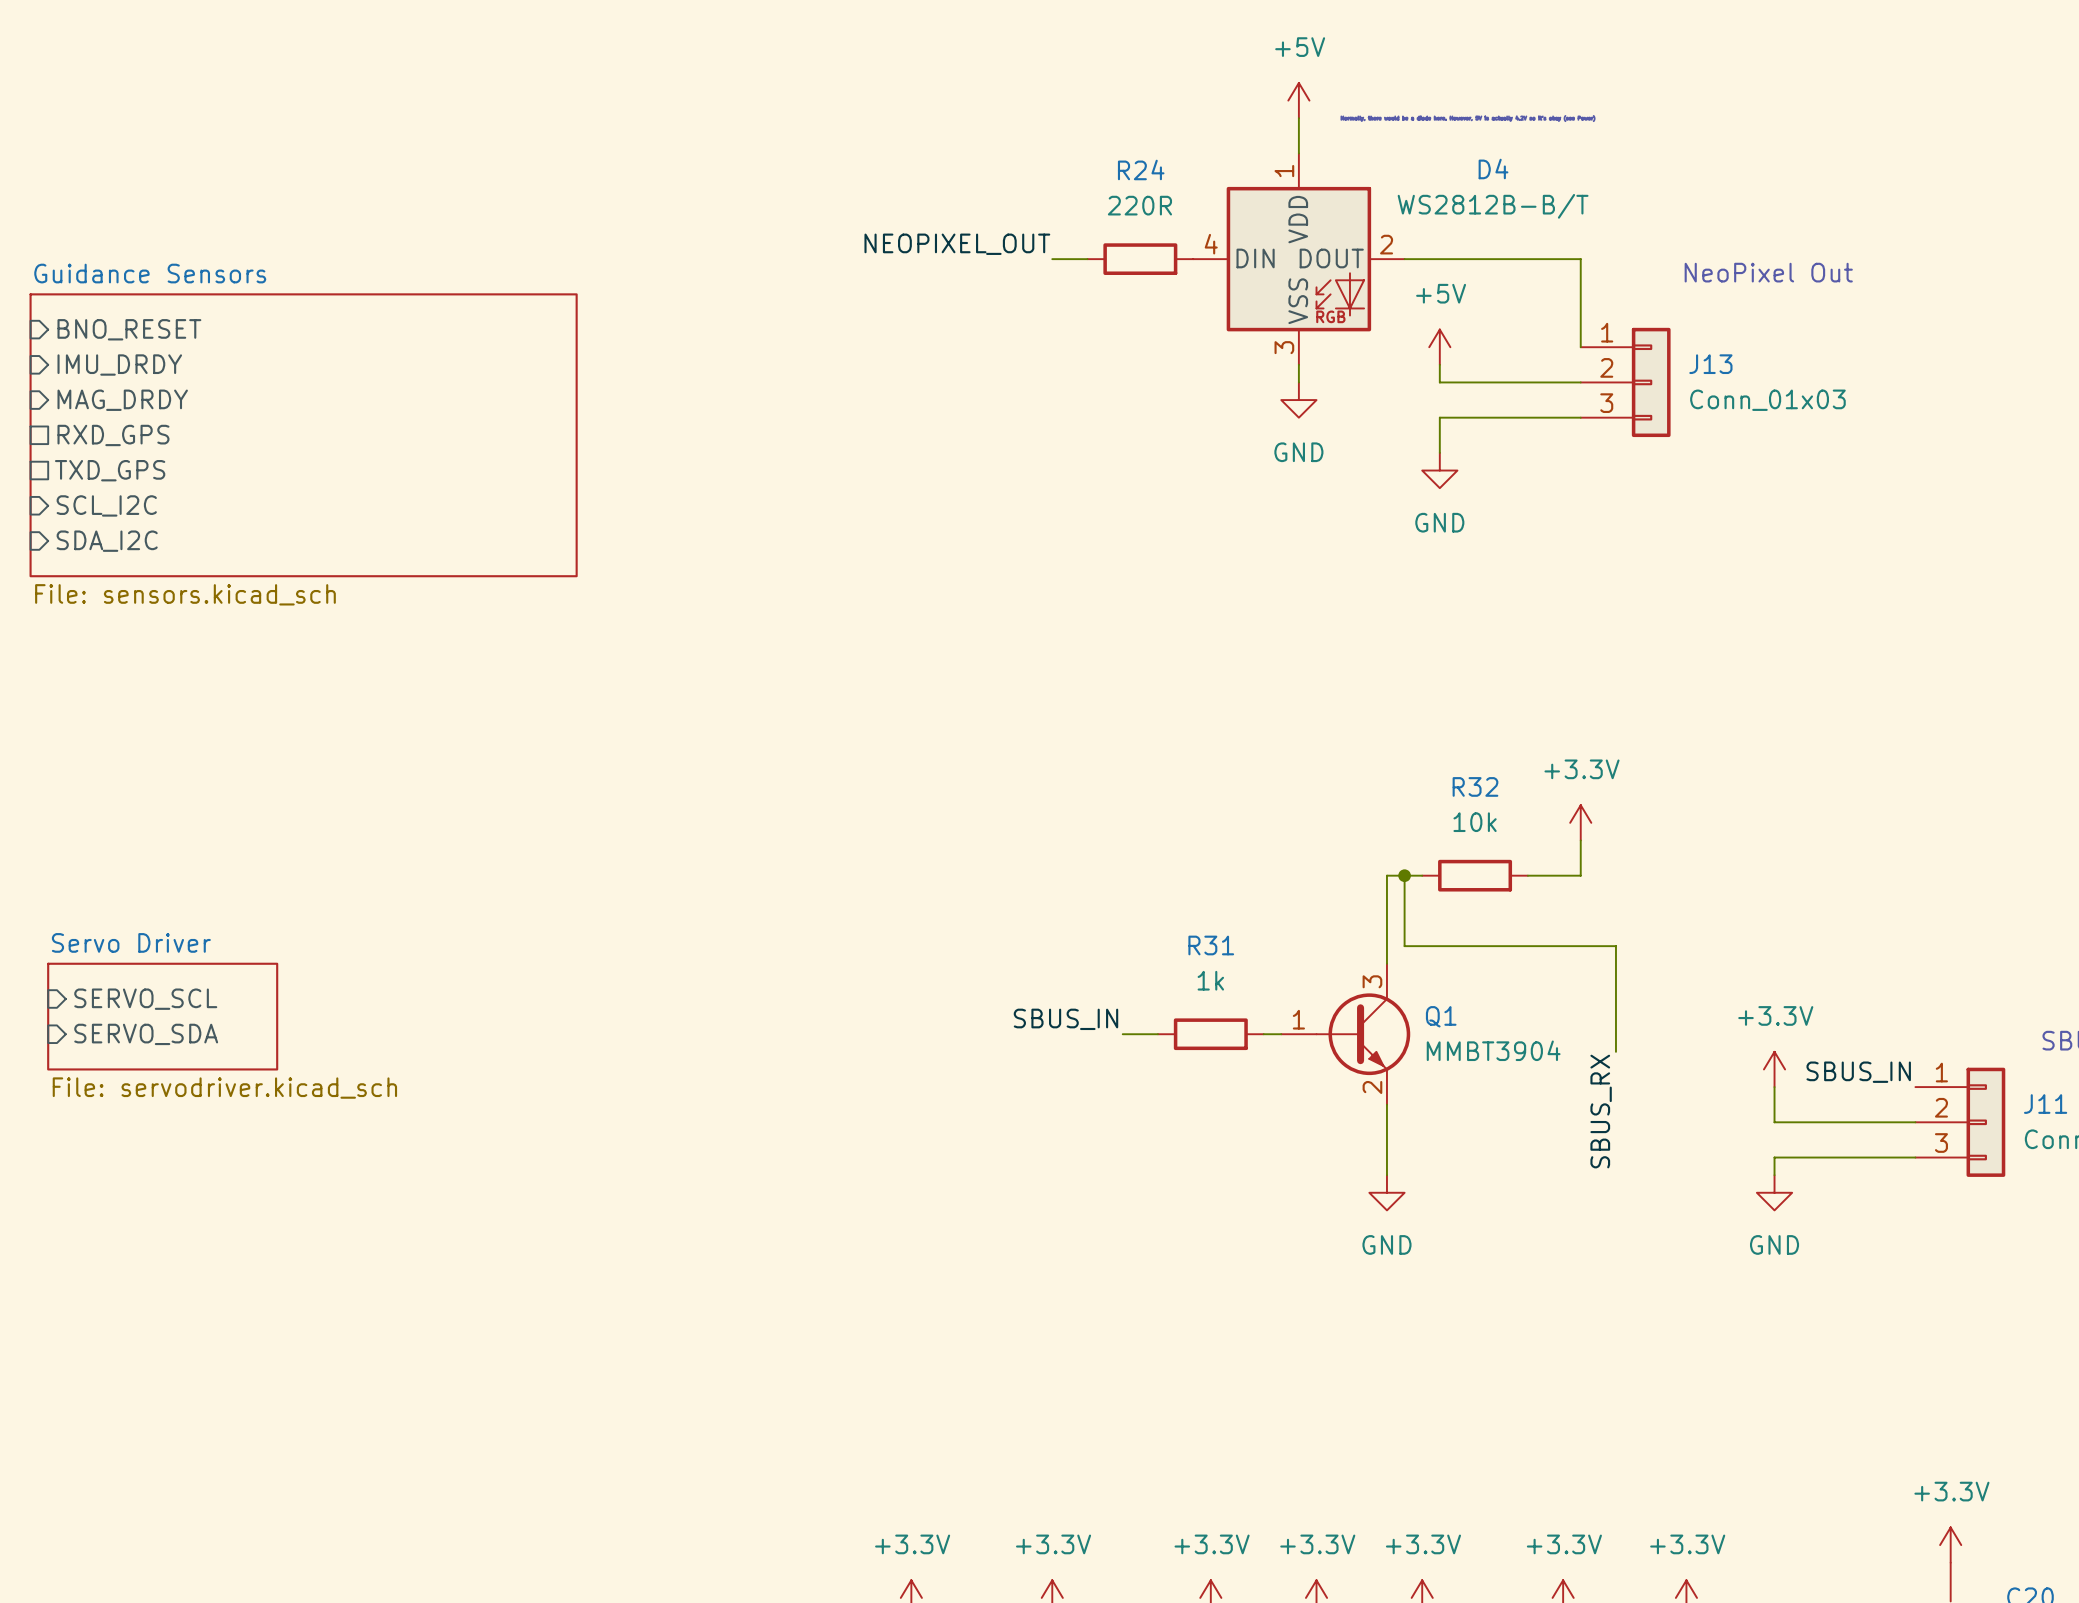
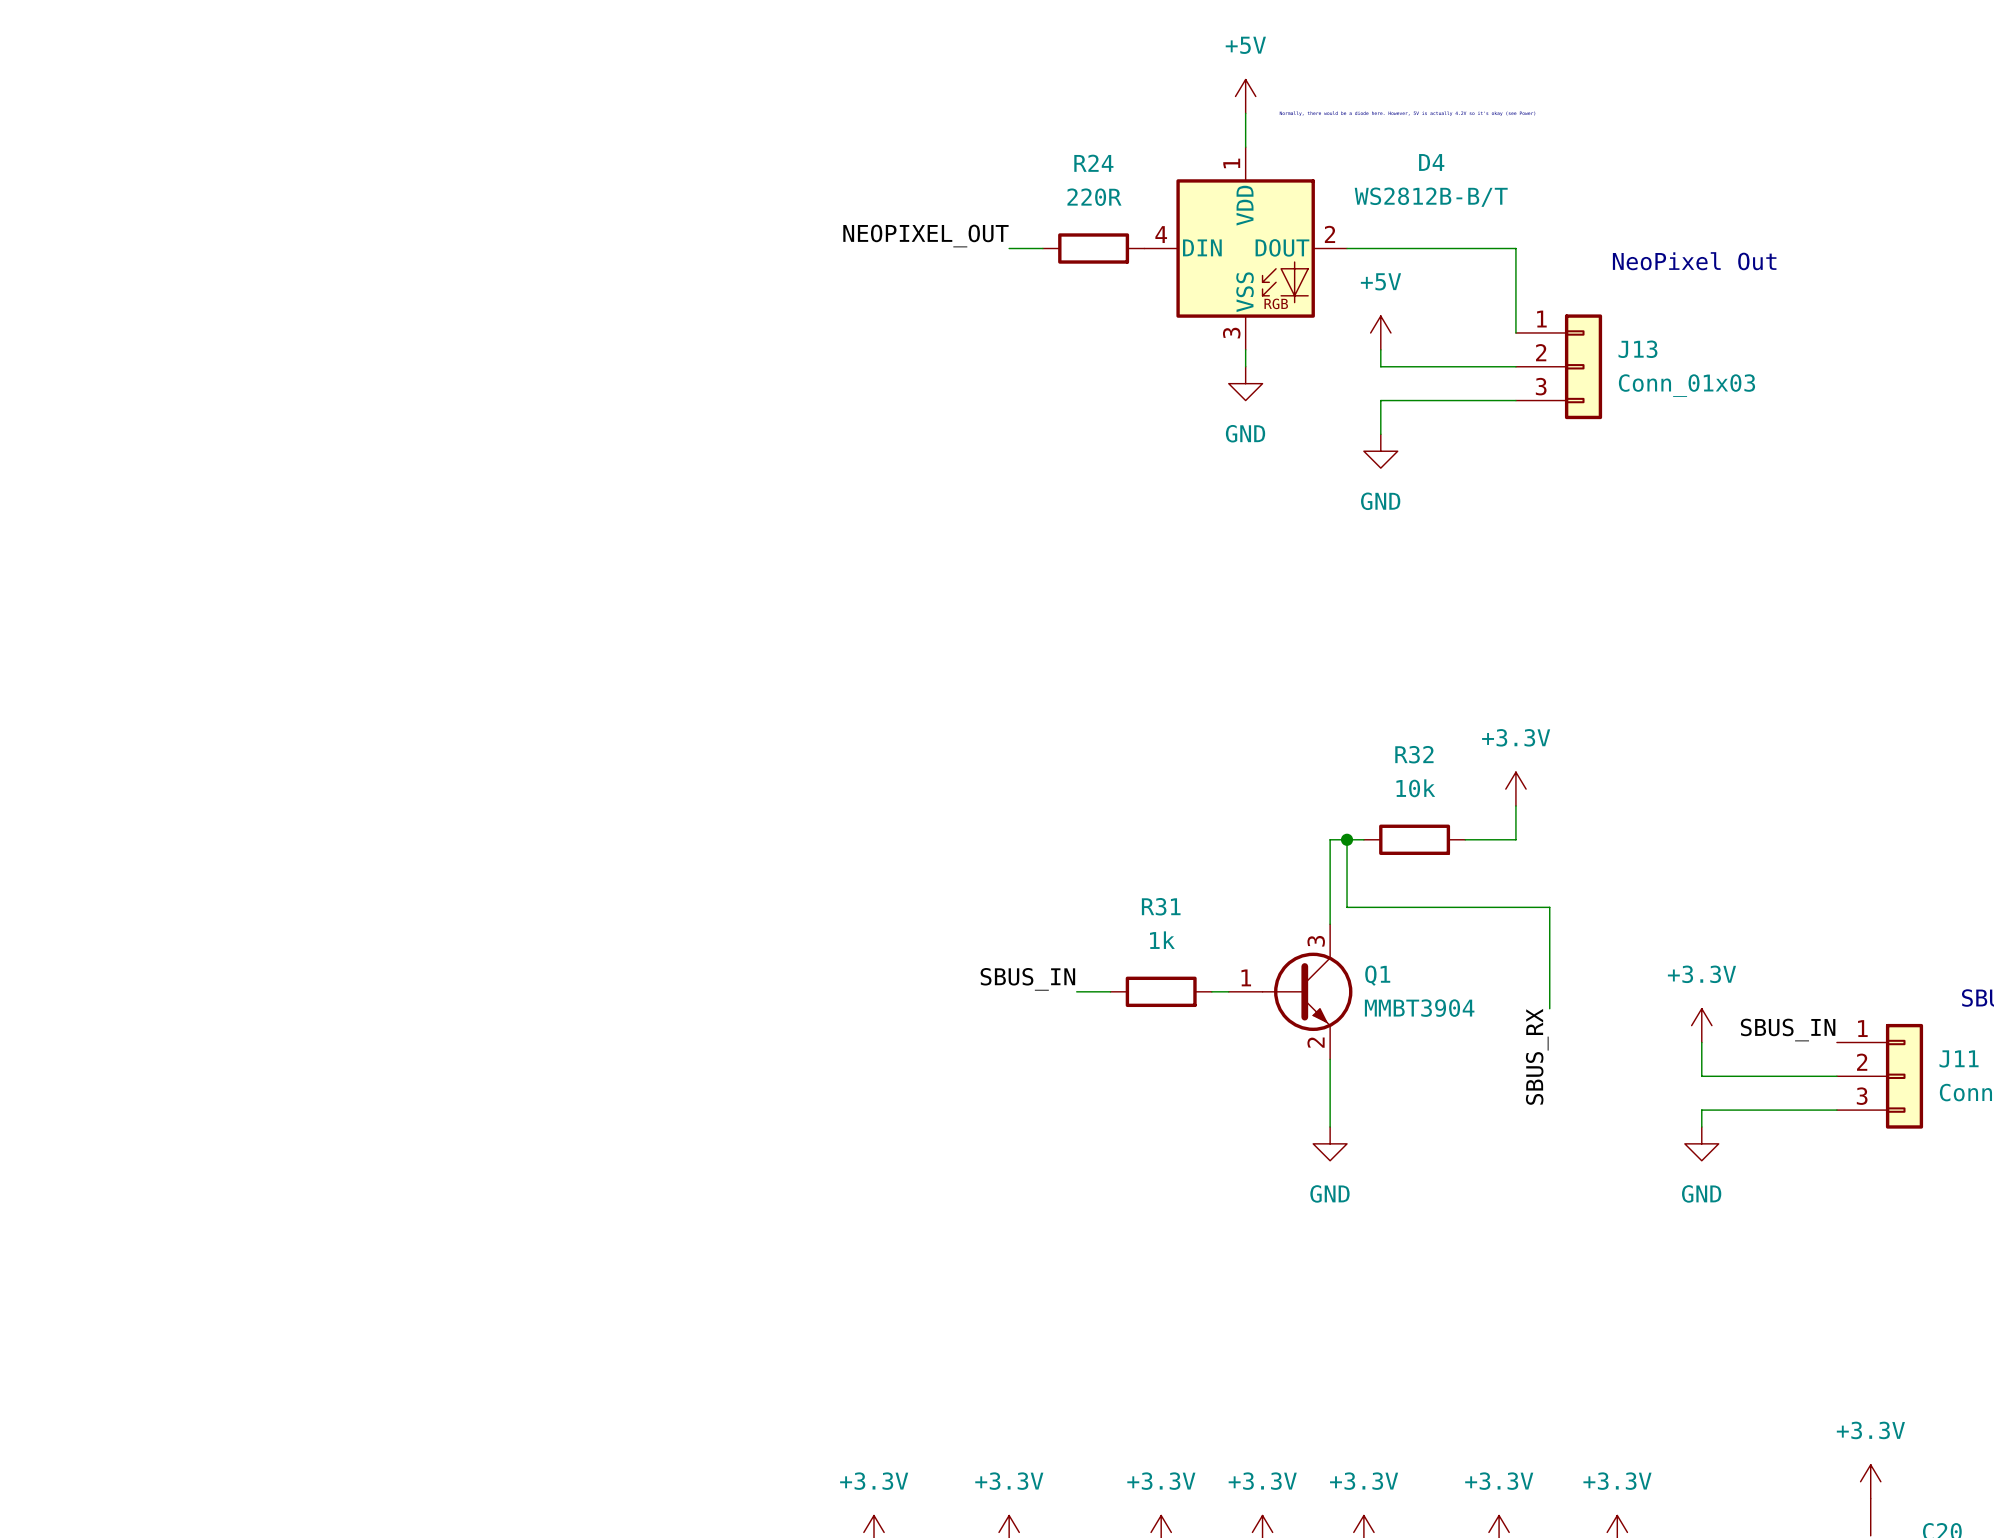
sheet pin: BNO_RESET (129, 329) -> none
sheet pin: IMU_DRDY (119, 365) -> none
sheet pin: MAG_DRDY (122, 400) -> none
sheet pin: RXD_GPS (113, 435) -> none
sheet Guidance Sensors: File: sensors.kicad_sch (303, 435) -> none
sheet pin: TXD_GPS (110, 470) -> none
sheet pin: SCL_I2C (106, 505) -> none
sheet pin: SDA_I2C (107, 541) -> none
sheet pin: SERVO_SCL (145, 999) -> none
sheet Servo Driver: File: servodriver.kicad_sch (162, 1016) -> none
sheet pin: SERVO_SDA (146, 1034) -> none

